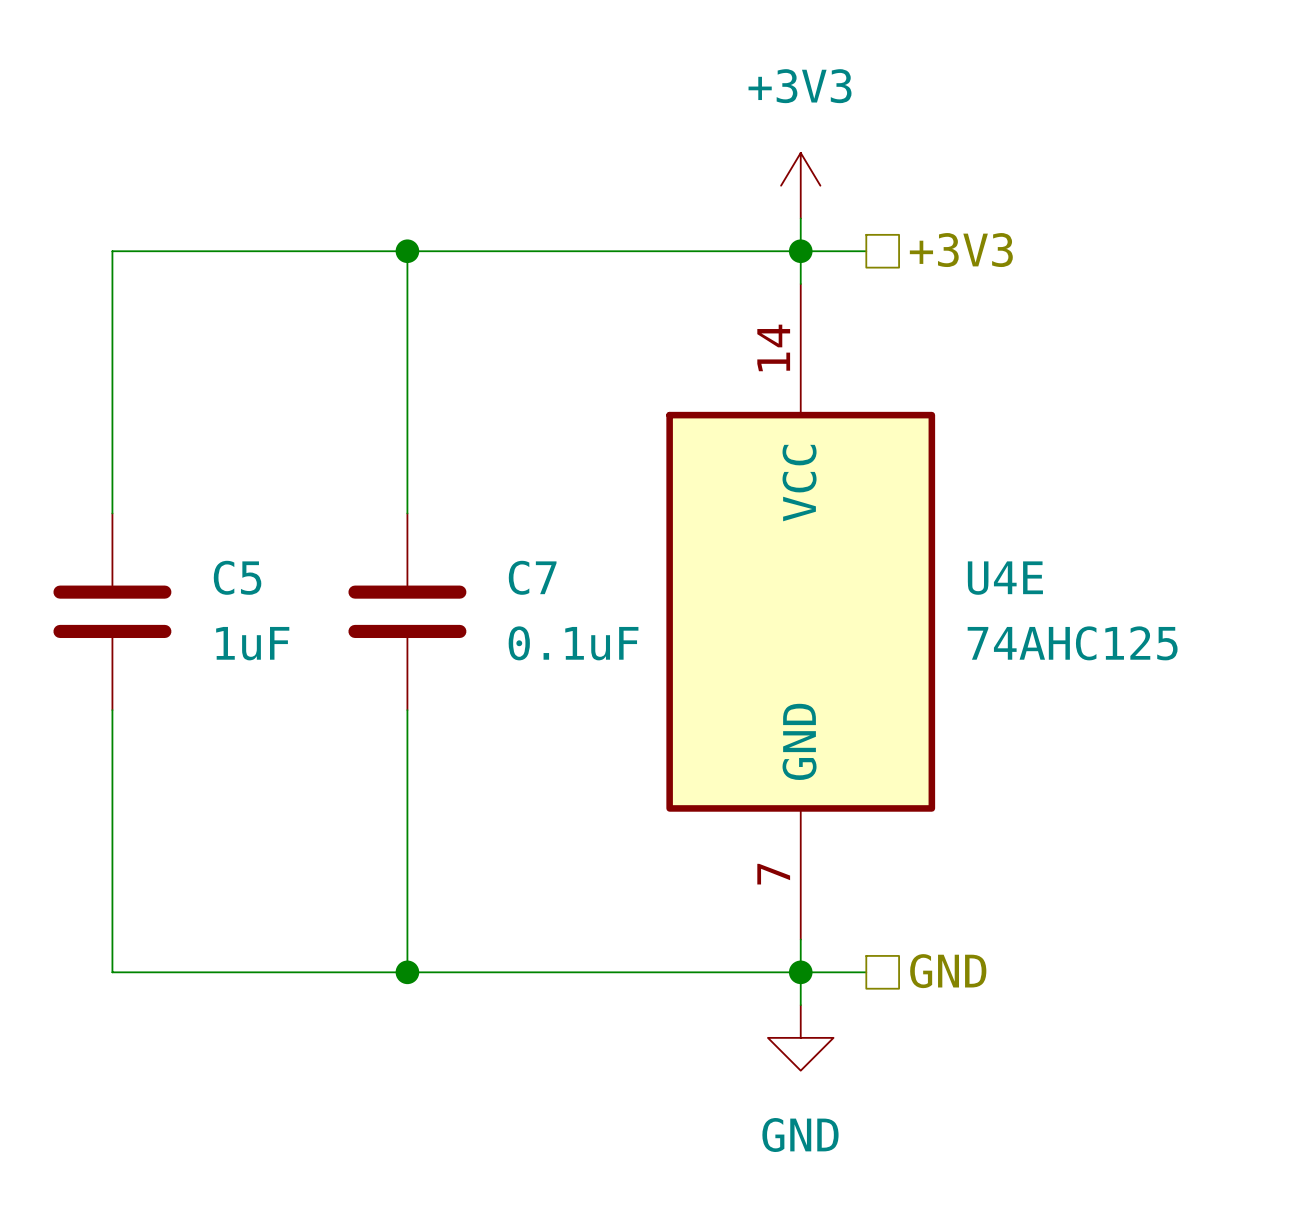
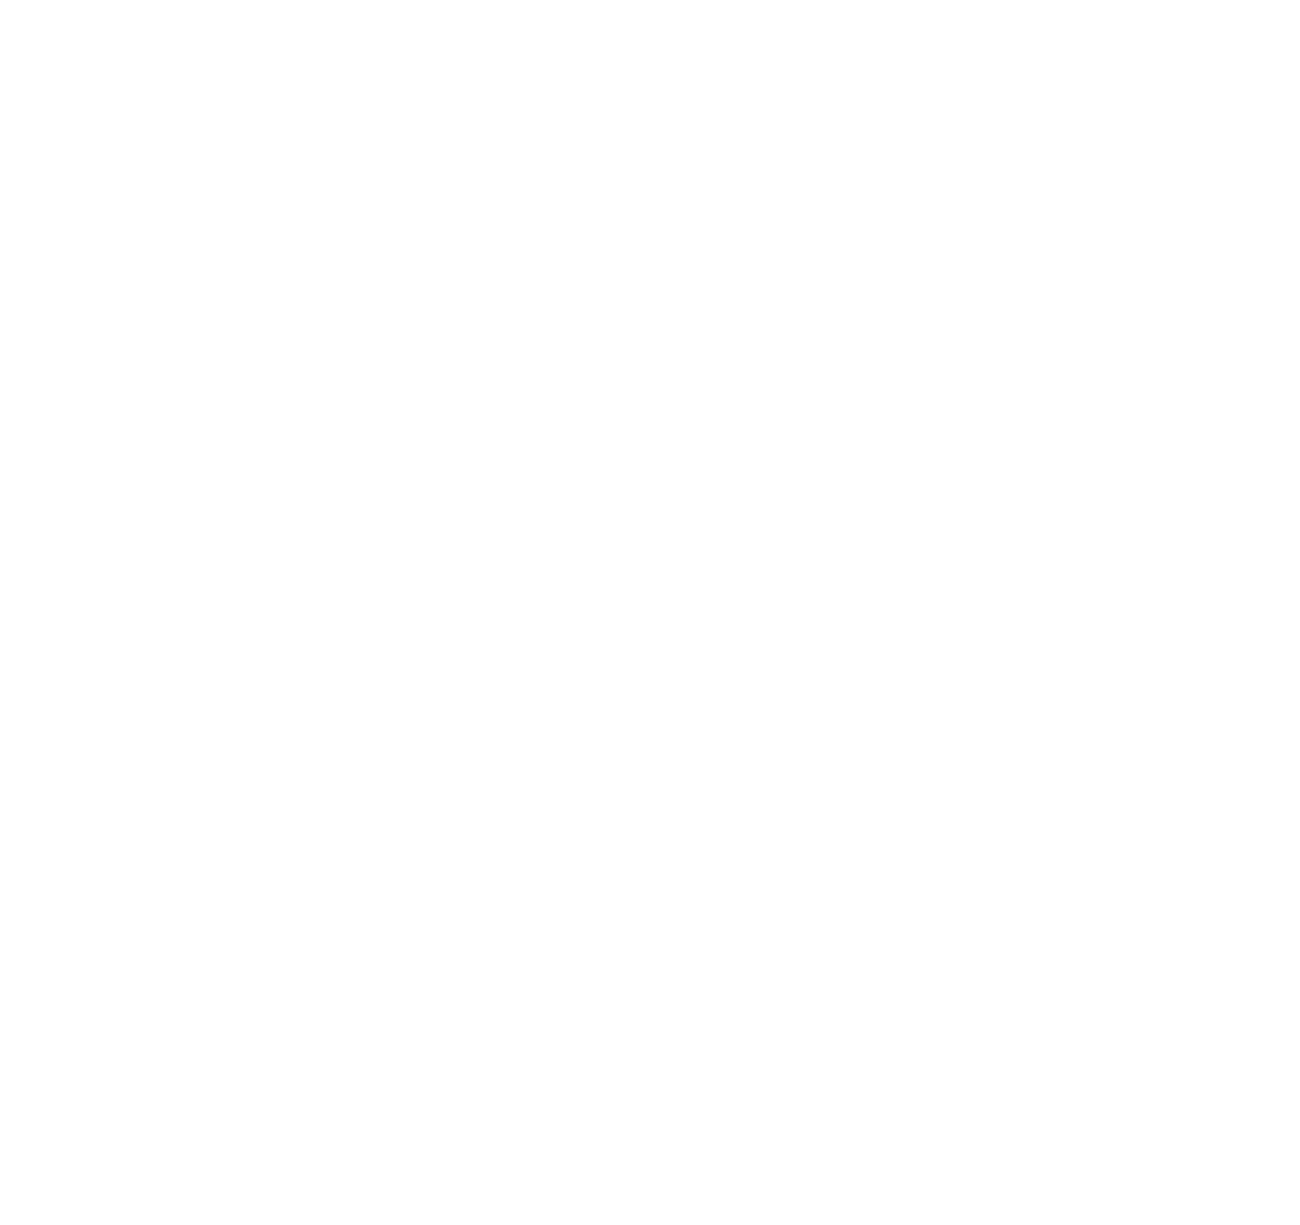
power symbol: +3V3 (800, 185) -> none
wire: (800, 218) (800, 284) -> none
hierarchical label: +3V3 (961, 250) -> none
wire: (407, 251) (407, 513) -> none
junction: (407, 251) -> none
junction: (800, 251) -> none
wire: (866, 251) (112, 251) (112, 513) -> none
C5: 1uF (112, 611) -> none
C7: 0.1uF (407, 611) -> none
U4E: 74AHC125 (800, 611) -> none
wire: (112, 710) (112, 972) (866, 972) -> none
wire: (407, 710) (407, 972) -> none
wire: (800, 939) (800, 1005) -> none
hierarchical label: GND (948, 971) -> none
junction: (407, 972) -> none
junction: (800, 972) -> none
power symbol: GND (800, 1037) -> none

